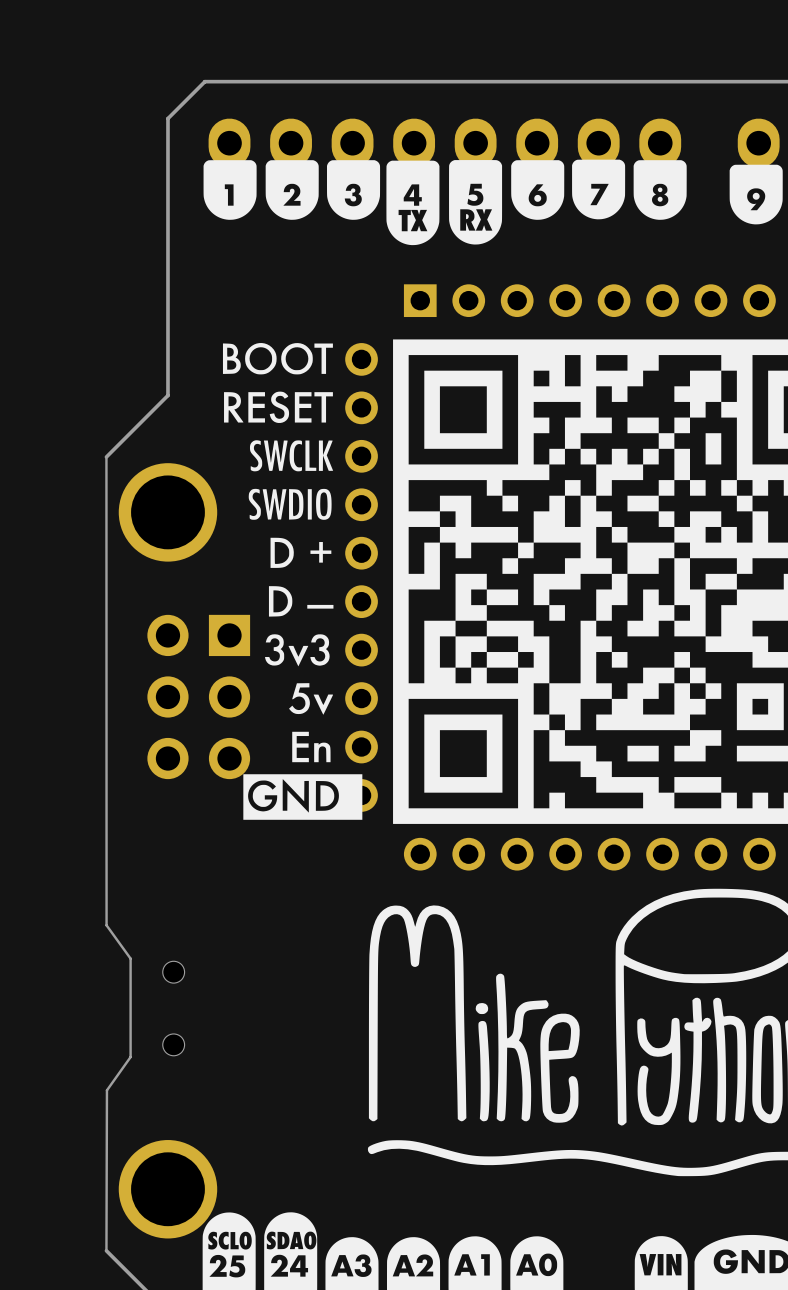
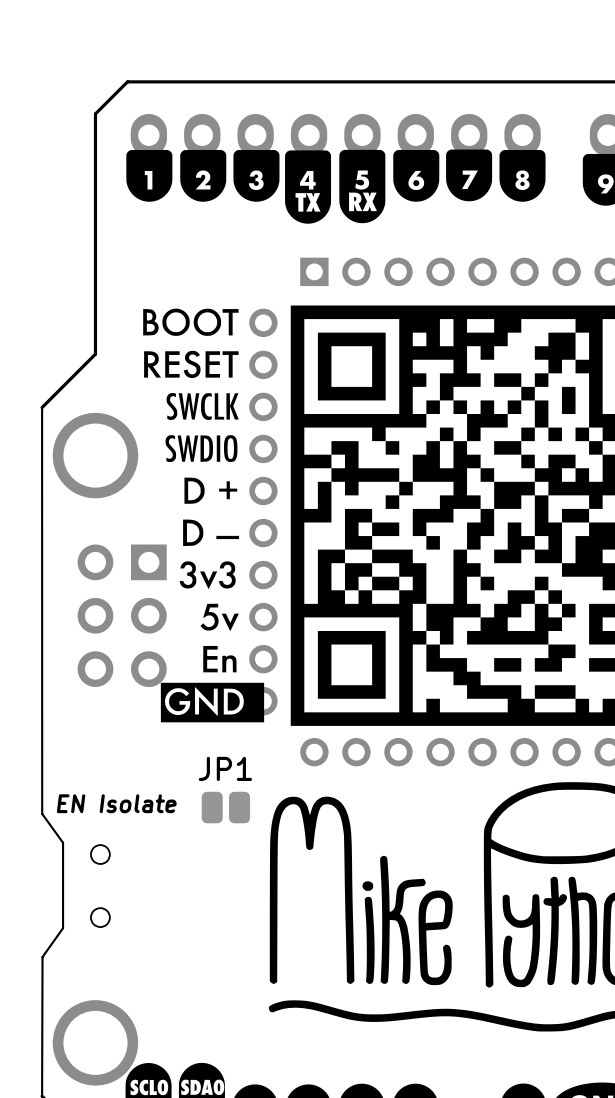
JP1: none -> (225, 807)

